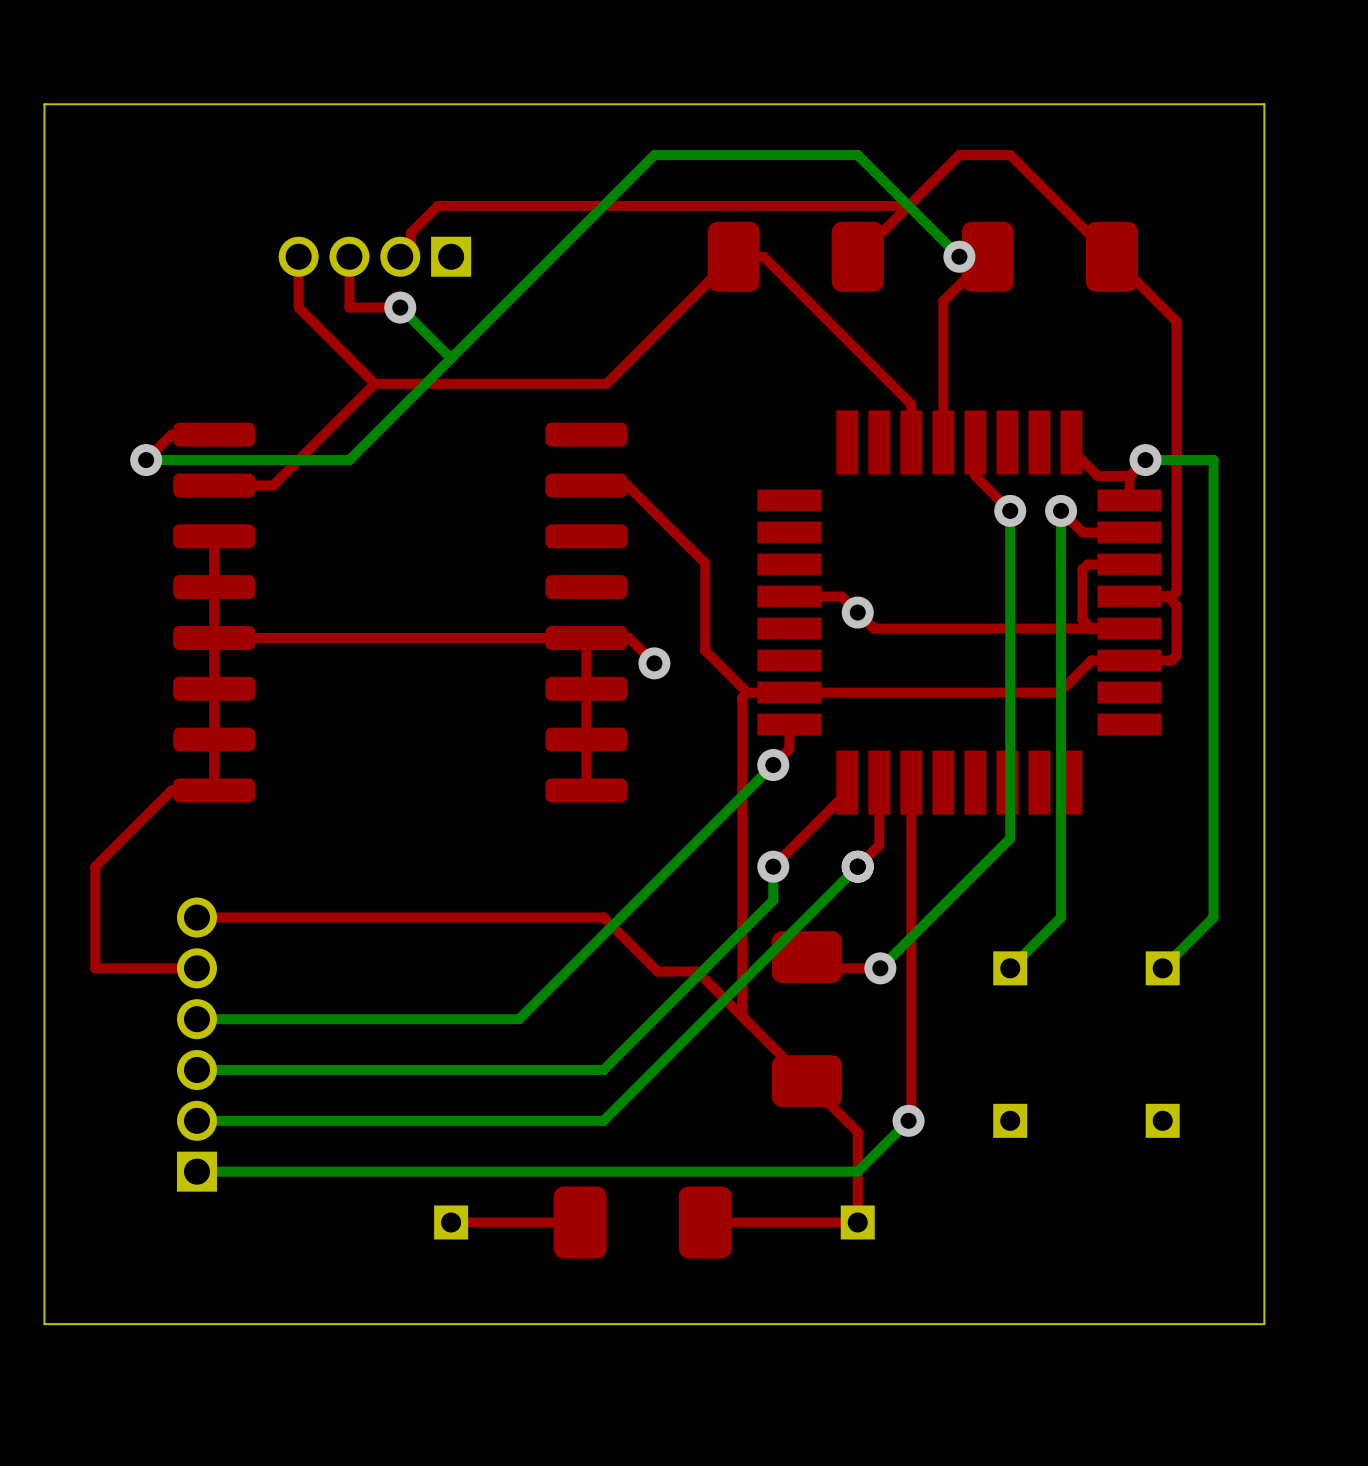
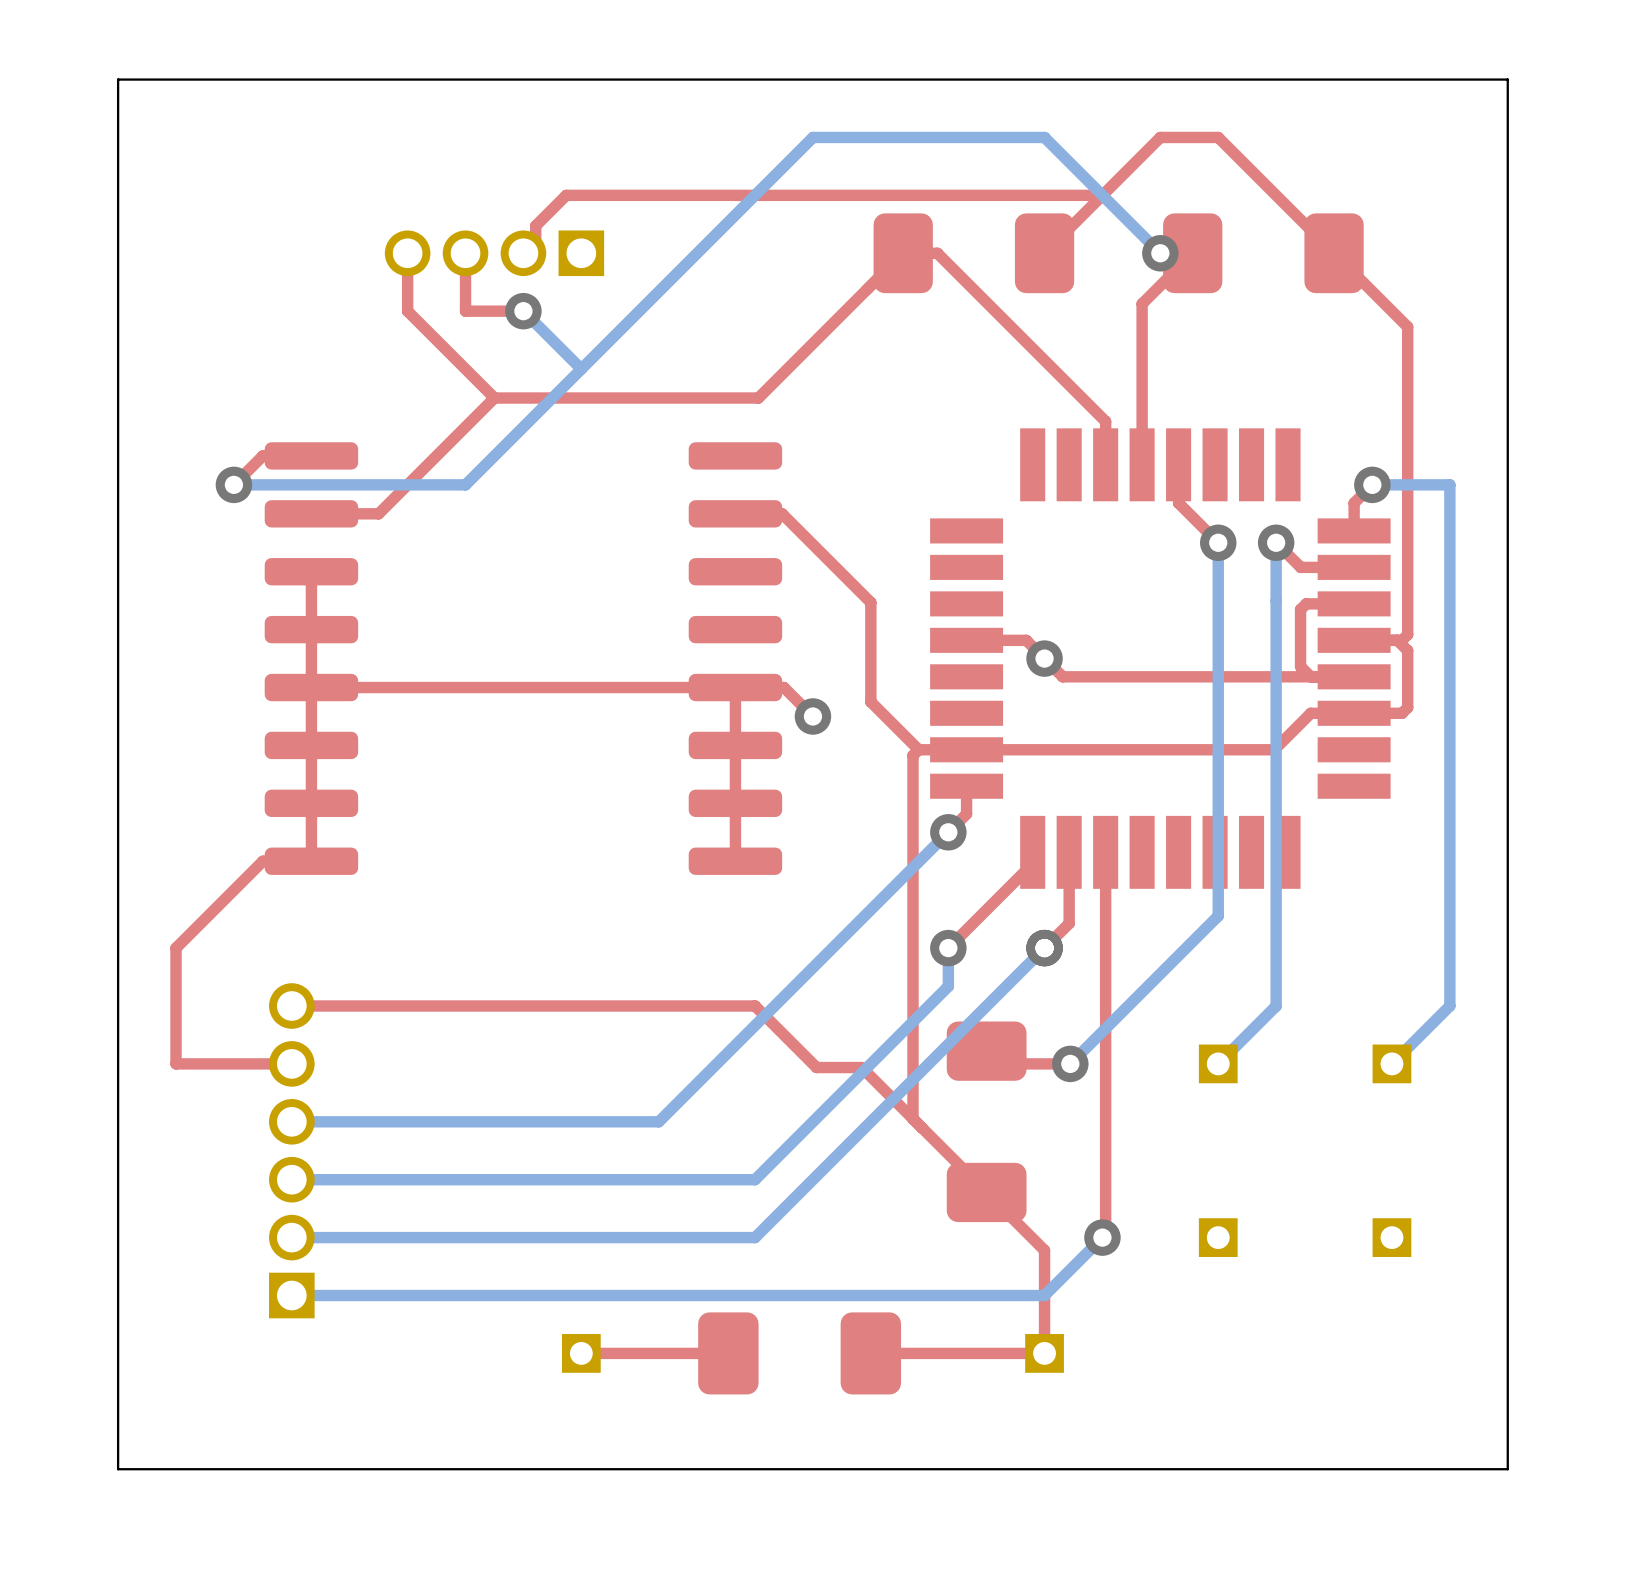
top track: (1071, 442) (1071, 449) (1097, 476) (1129, 476) -> none

